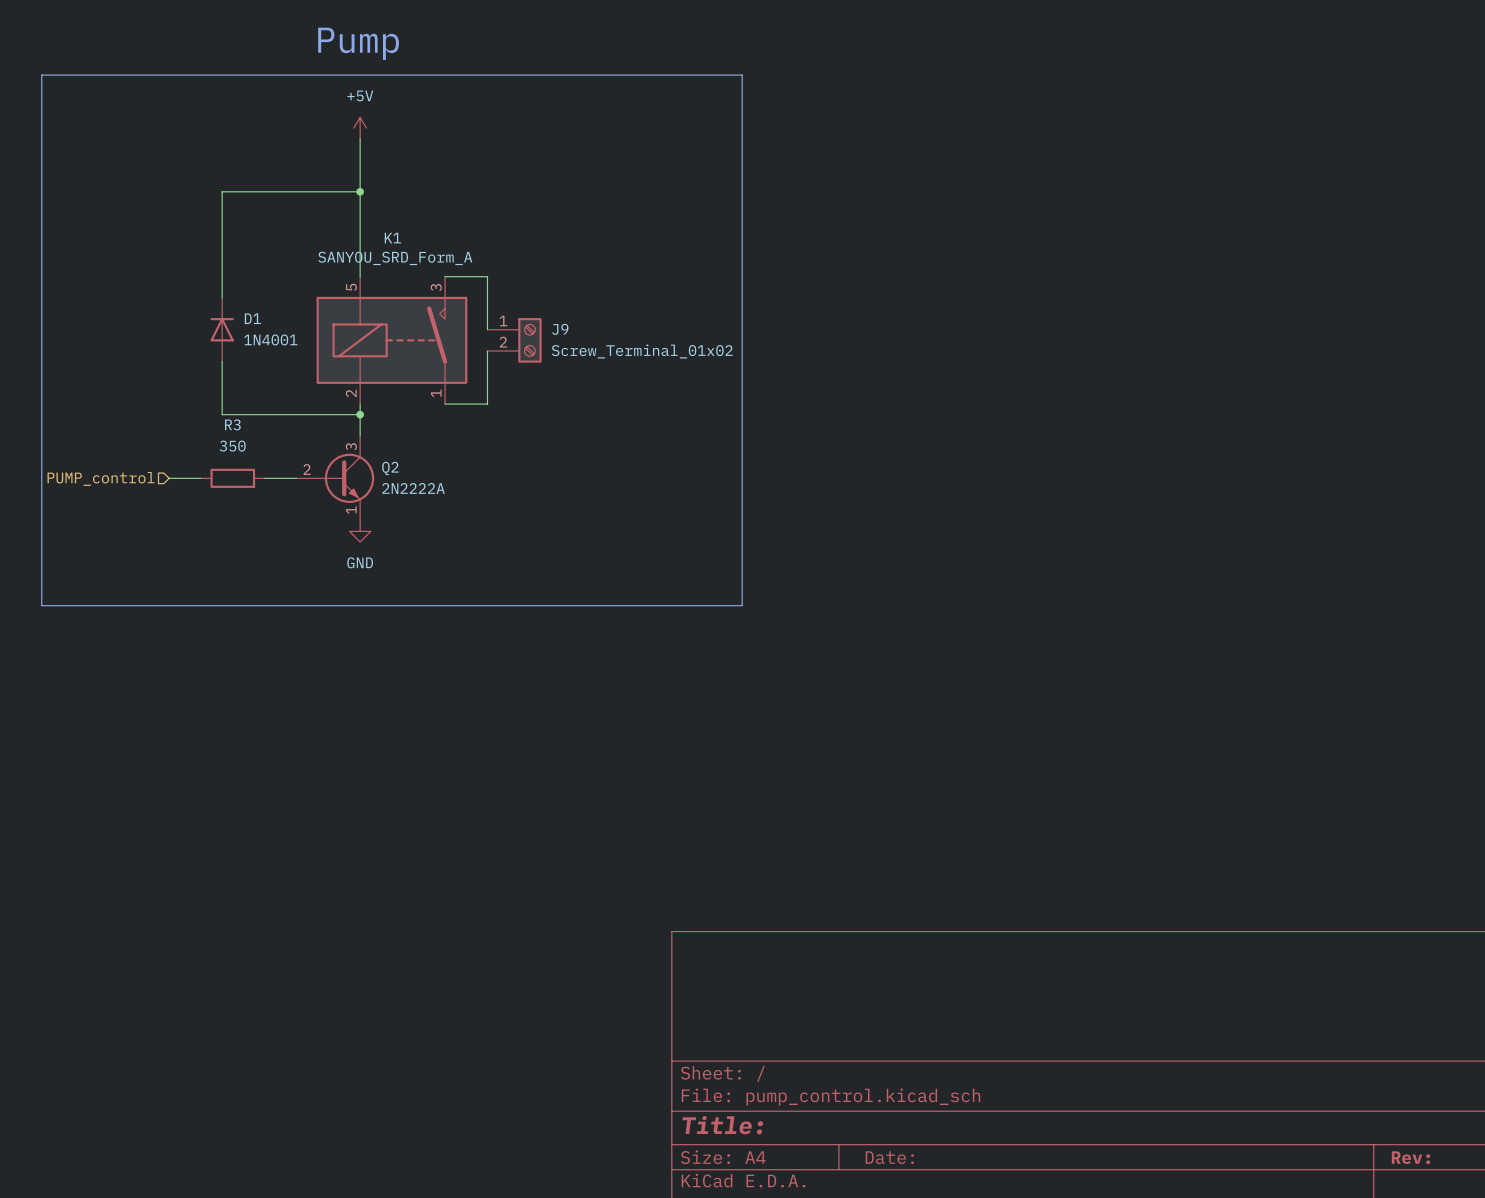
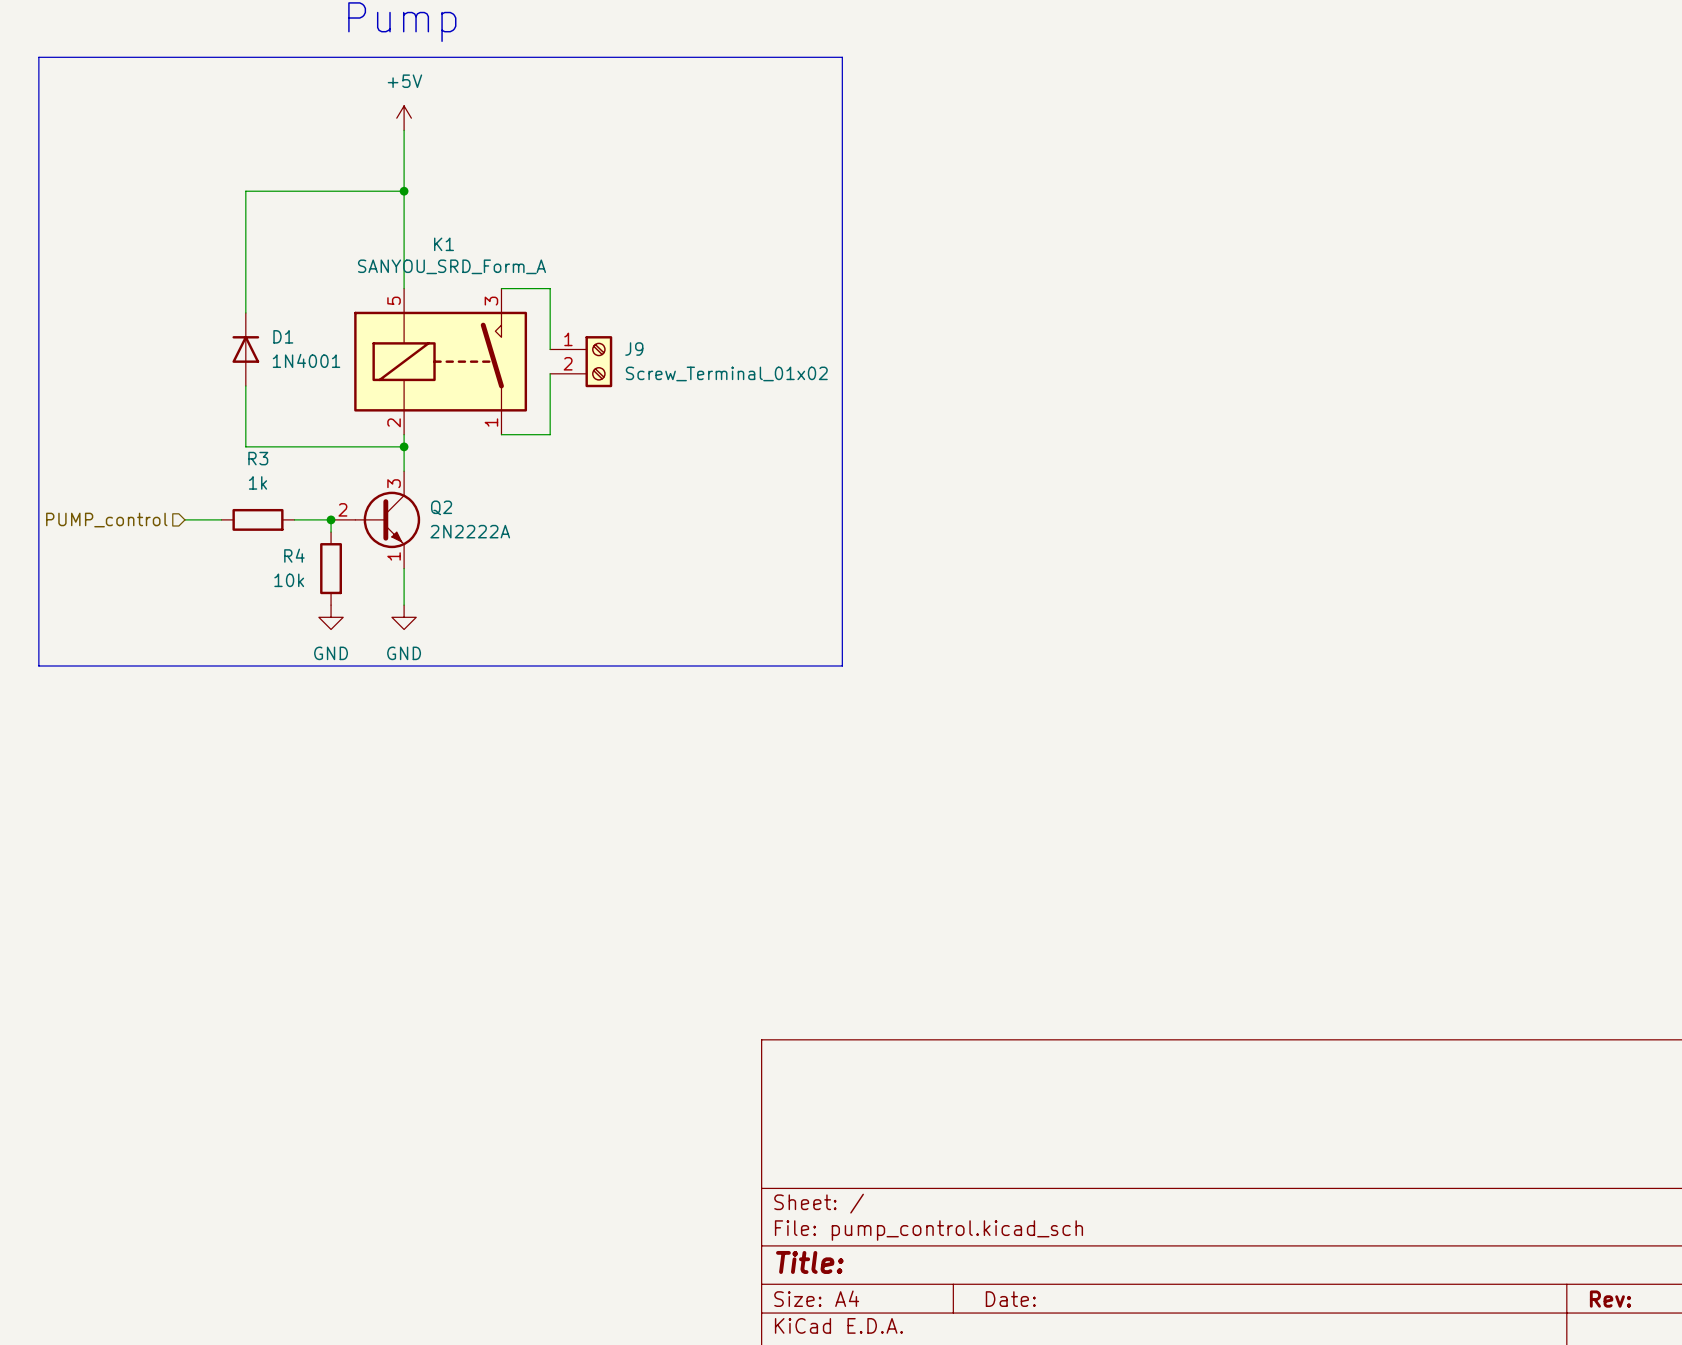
R3 value: 350 (232, 446) -> 1k (258, 482)
wire: none -> (331, 519) (331, 532)
junction: none -> (331, 519)
R4: none -> 10k (331, 568)
wire: none -> (404, 568) (404, 605)
power symbol position: GND (360, 531) -> GND (404, 617)
power symbol: none -> GND (331, 617)

